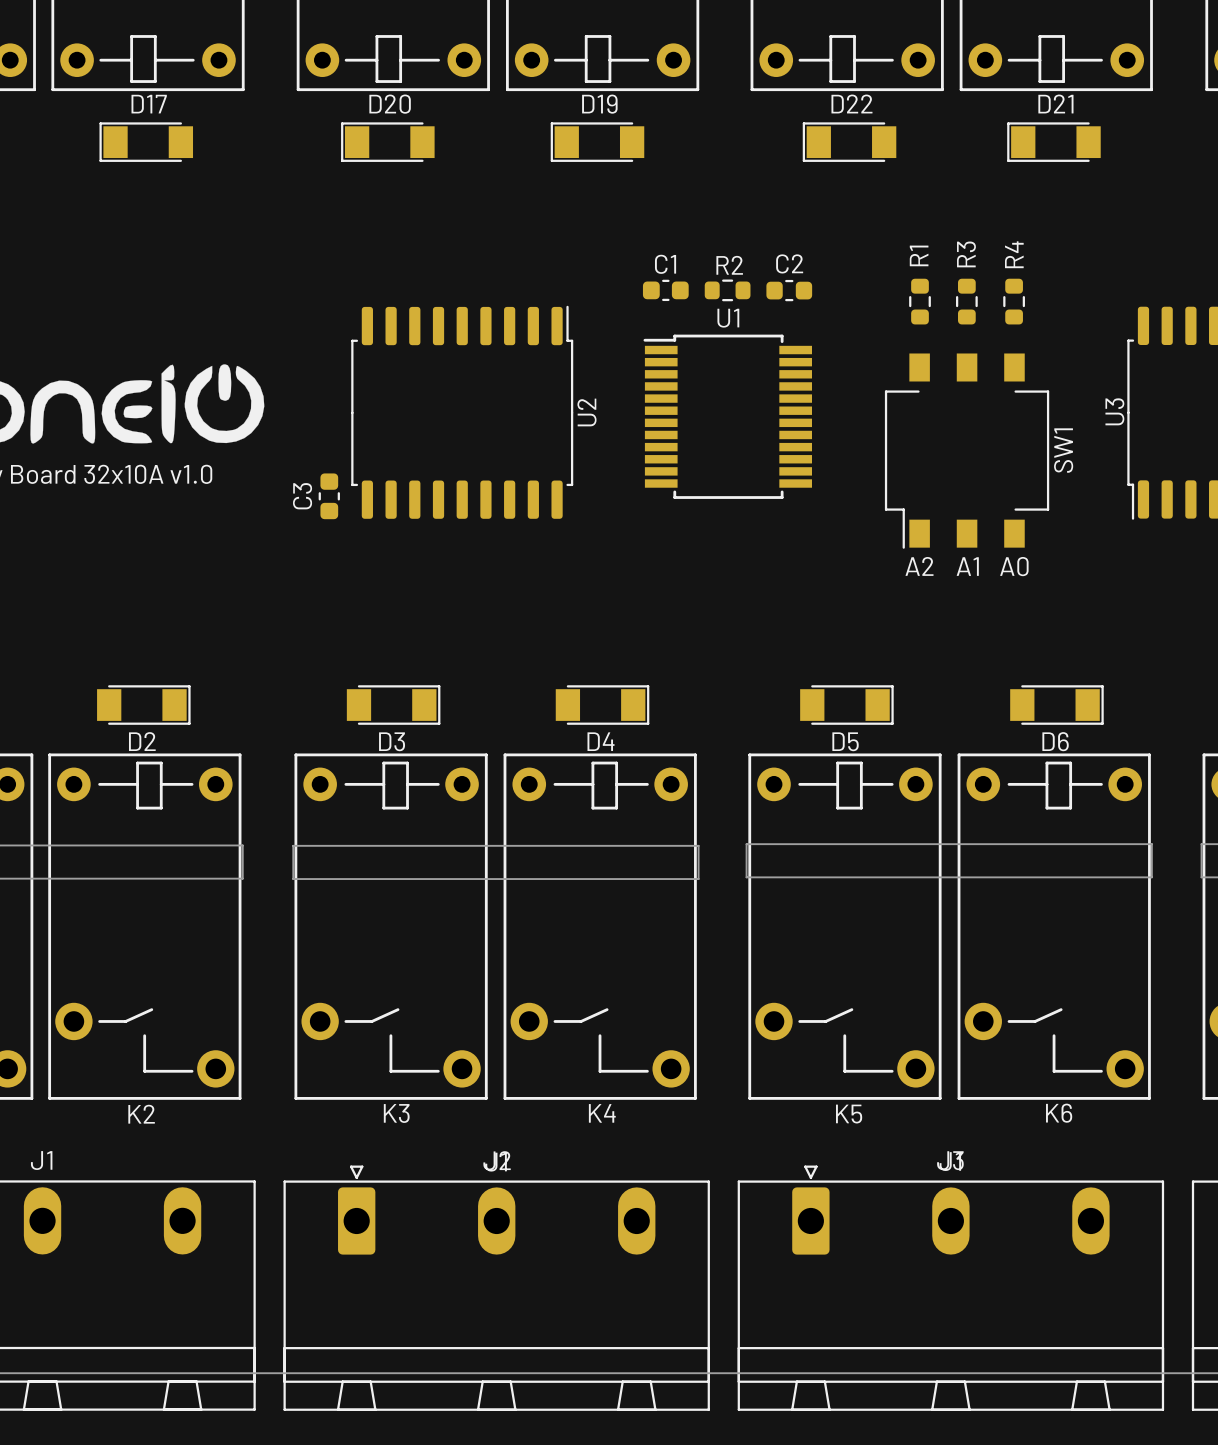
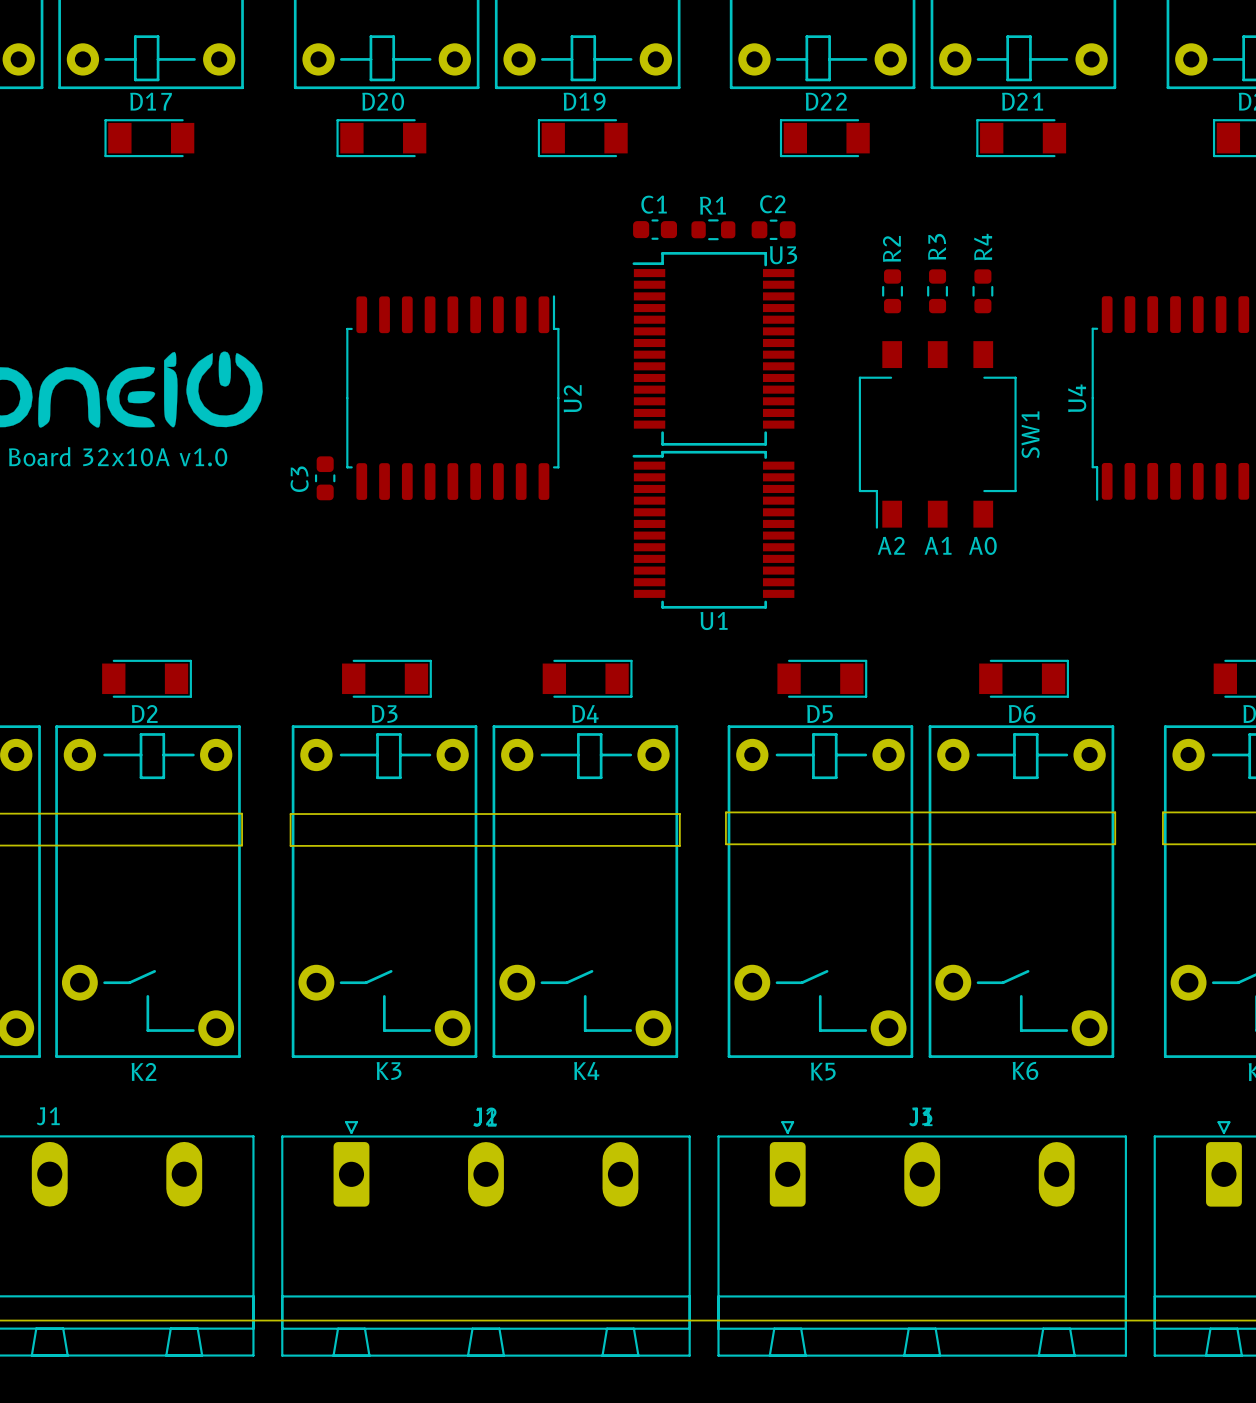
R1: none -> (713, 229)
R1 name: R1 (919, 255) -> R2 (891, 248)
C1 position: (665, 290) -> (655, 229)
R2: (727, 290) -> none
C2 position: (789, 290) -> (773, 229)
U1 name position: U1 (728, 318) -> U1 (714, 621)
U3: none -> (713, 348)
U3 name: U3 (1114, 411) -> U4 (1077, 398)
U1 position: (727, 416) -> (713, 529)

